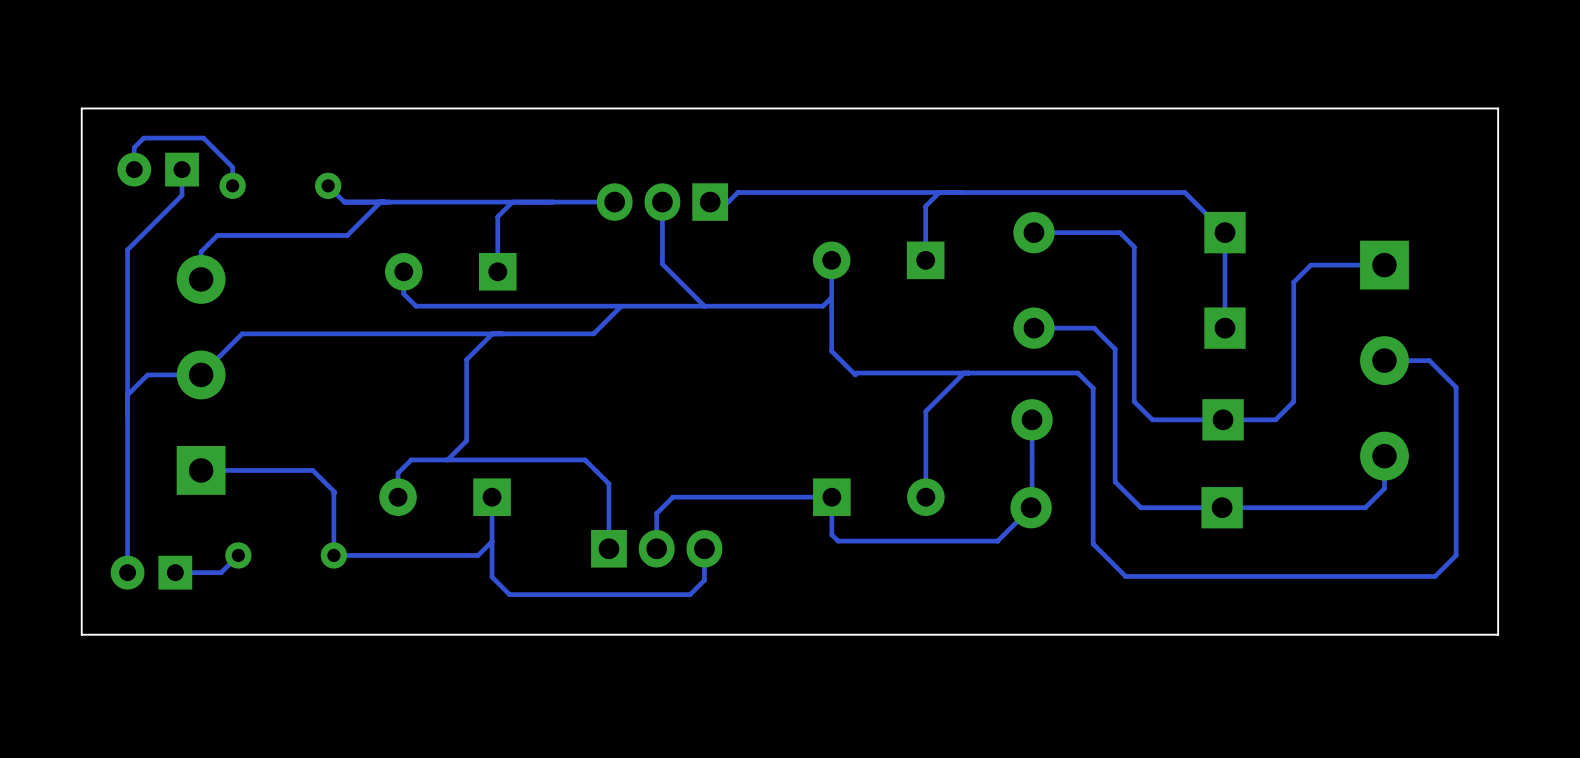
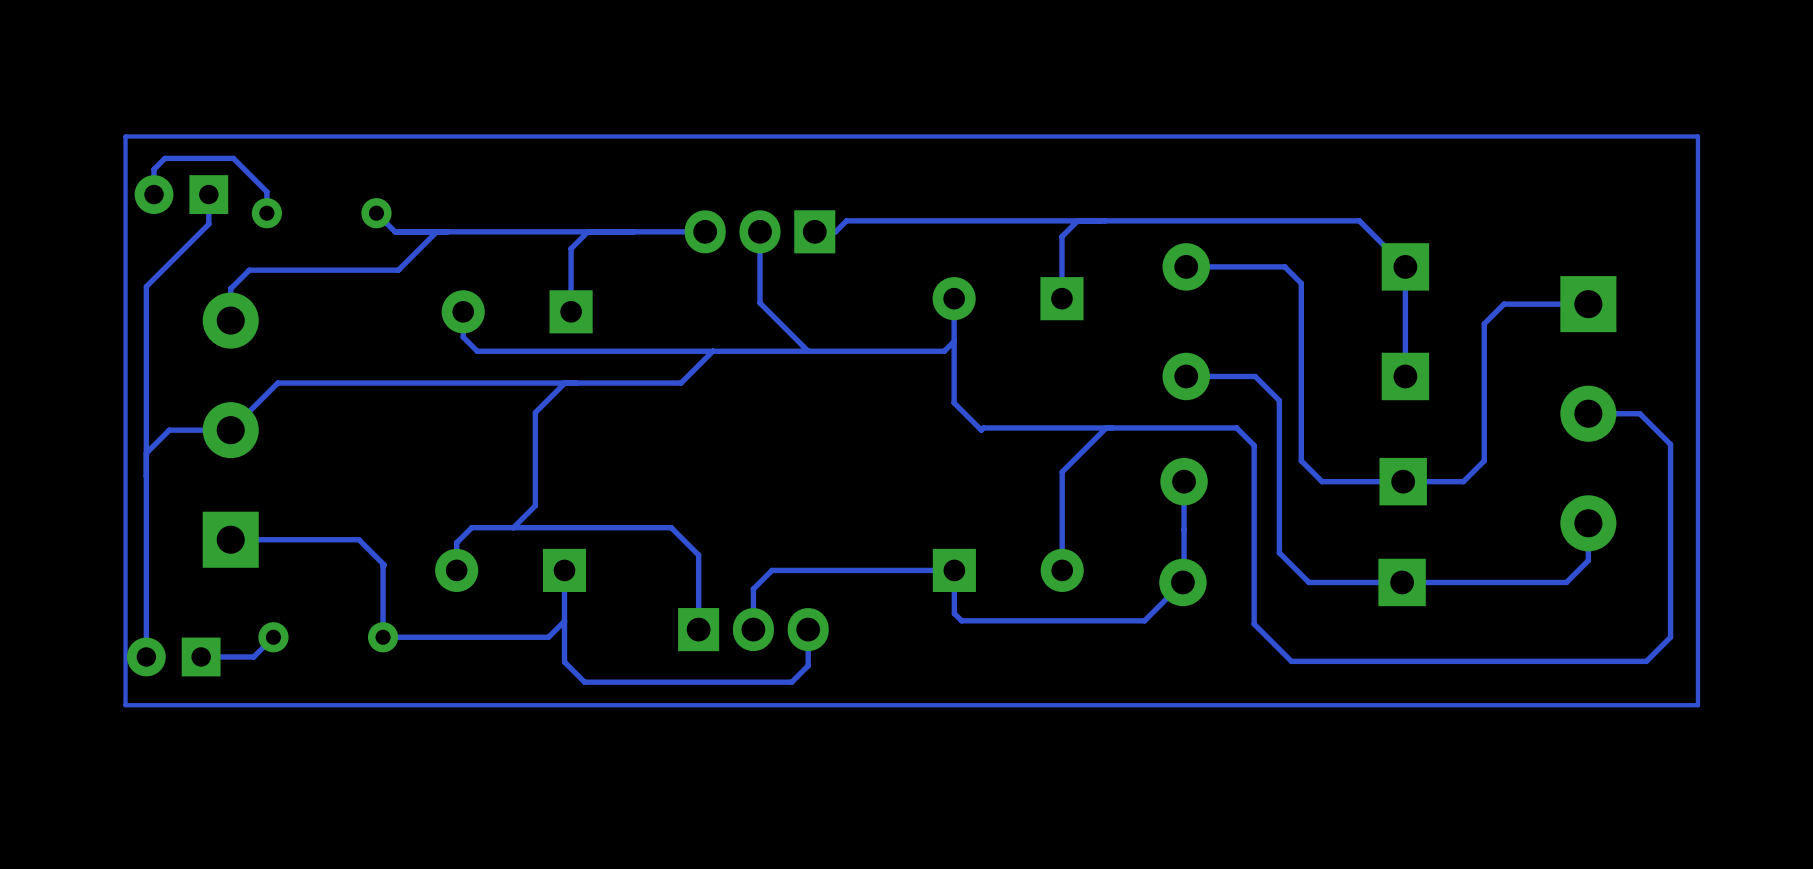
board edge: (1498, 108) (81, 108) (81, 634) (1498, 634) (1498, 108) -> none
track: none -> (1697, 136) (125, 136) (125, 705) (1697, 705) (1697, 136)

